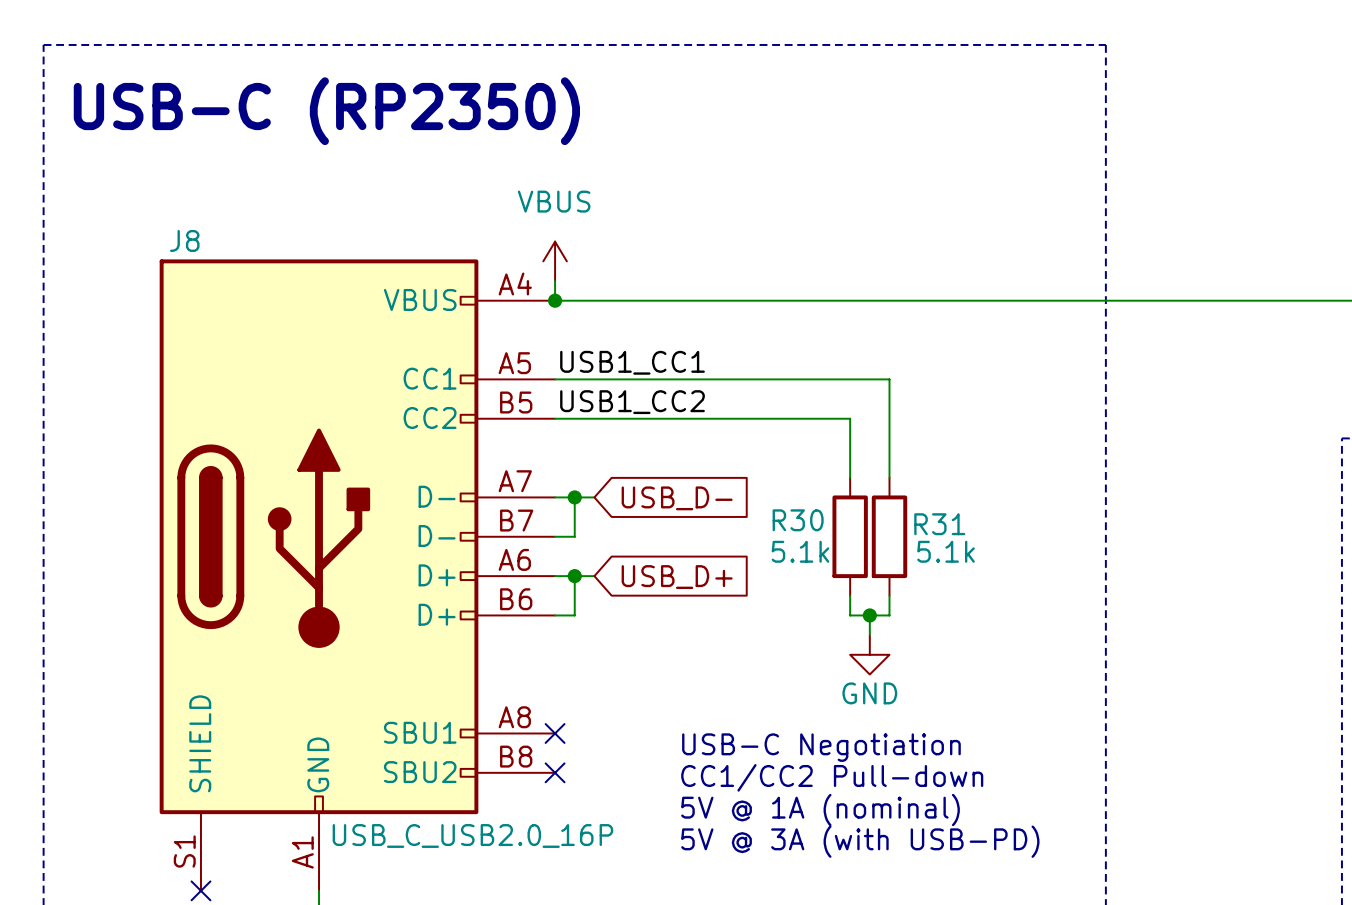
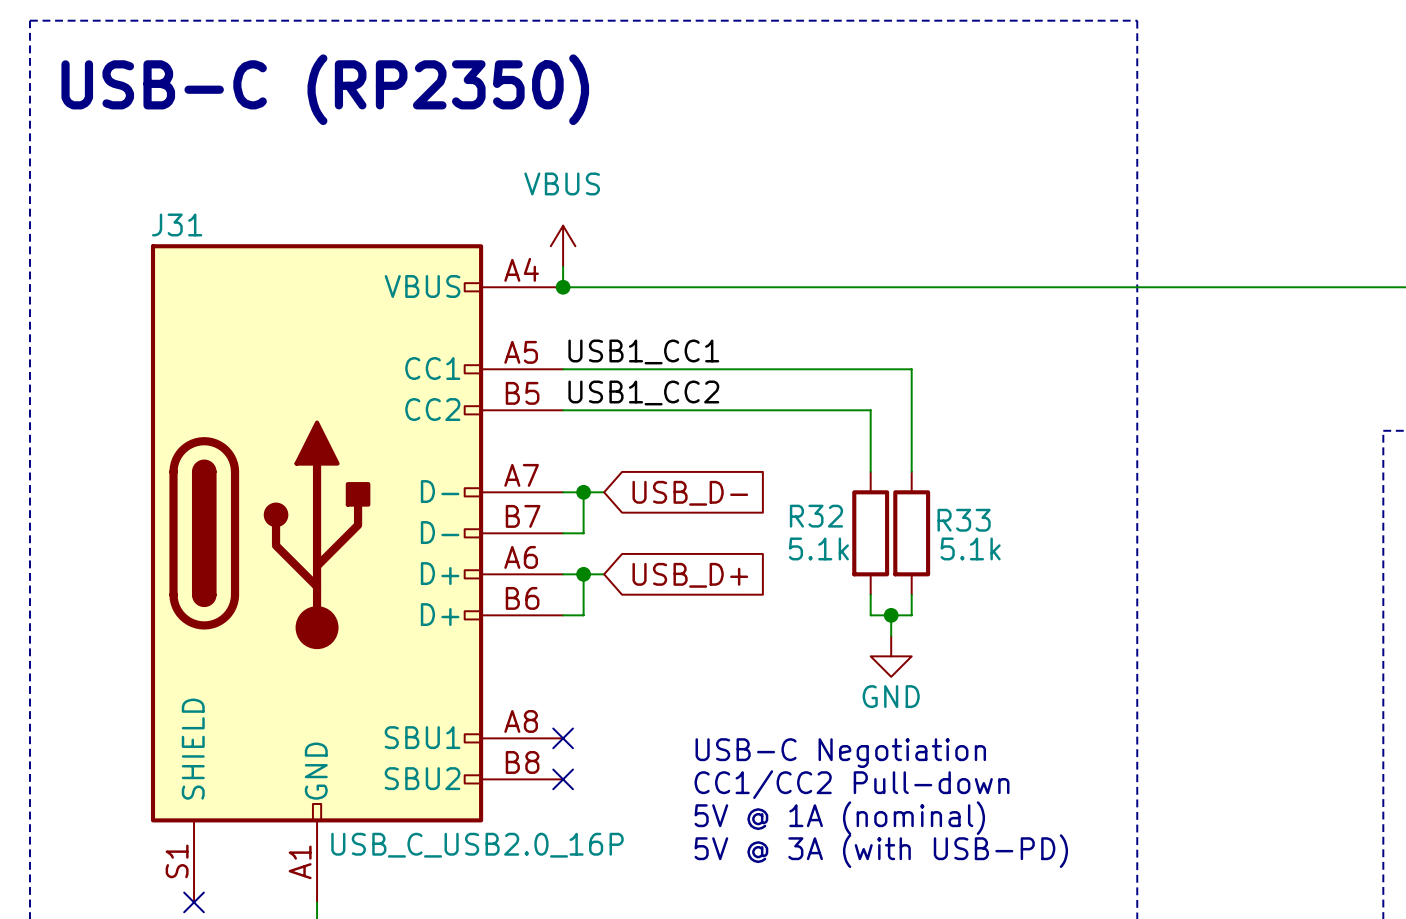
J8 name: J8 (184, 240) -> J31 (177, 224)
R30 name: R30 (798, 520) -> R32 (816, 516)
R31 name: R31 (939, 524) -> R33 (964, 520)

